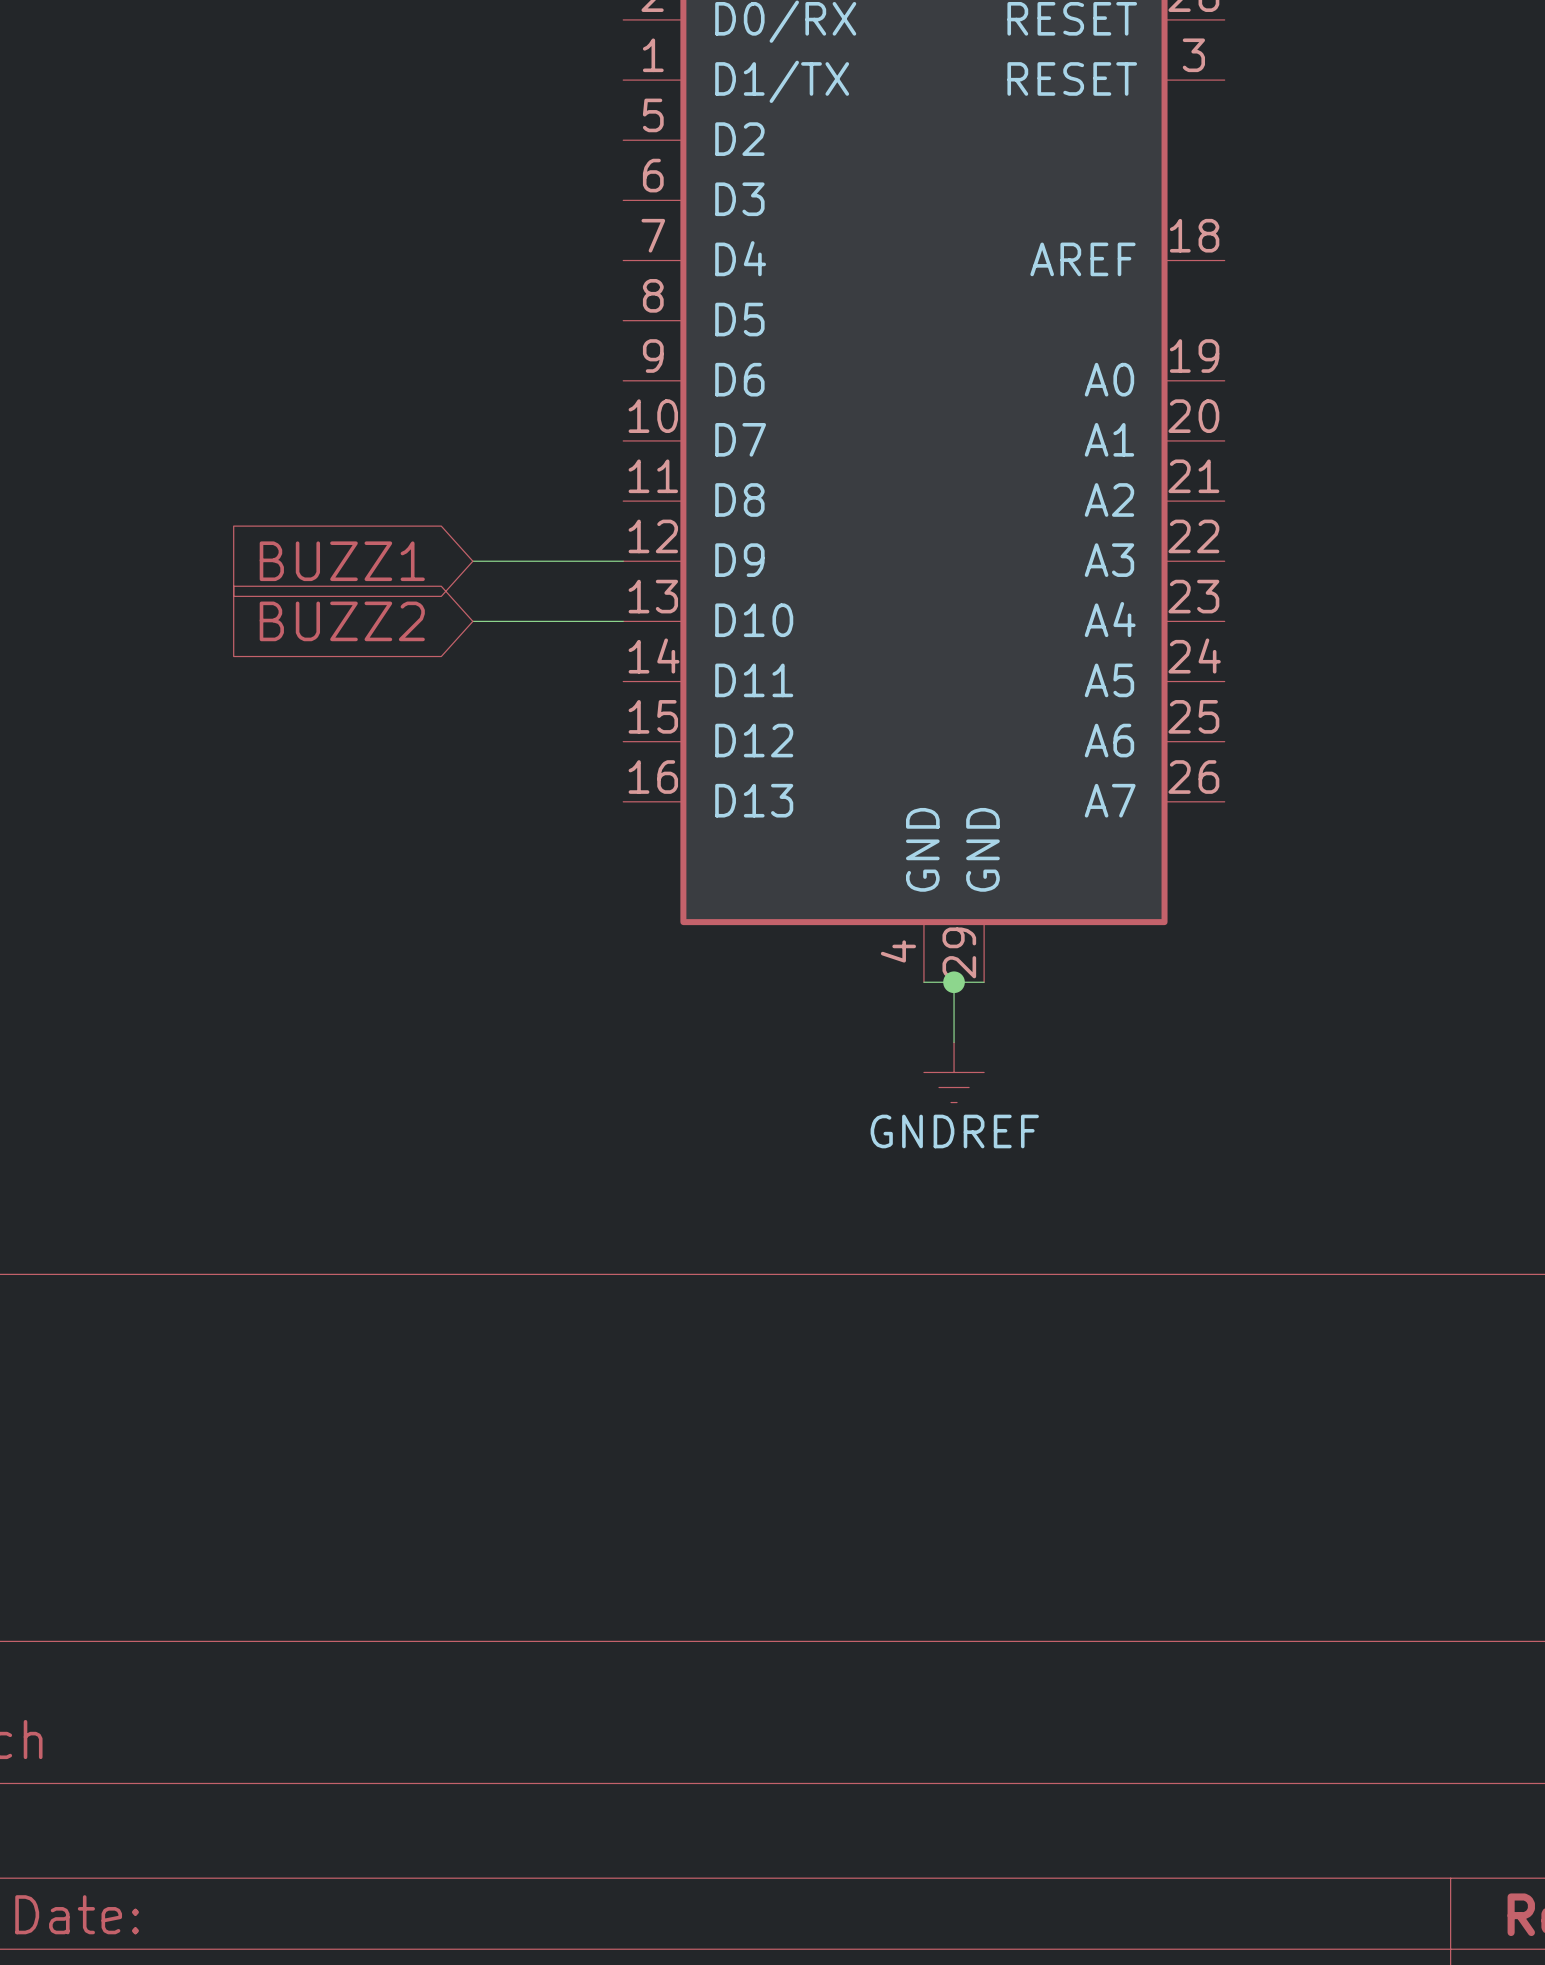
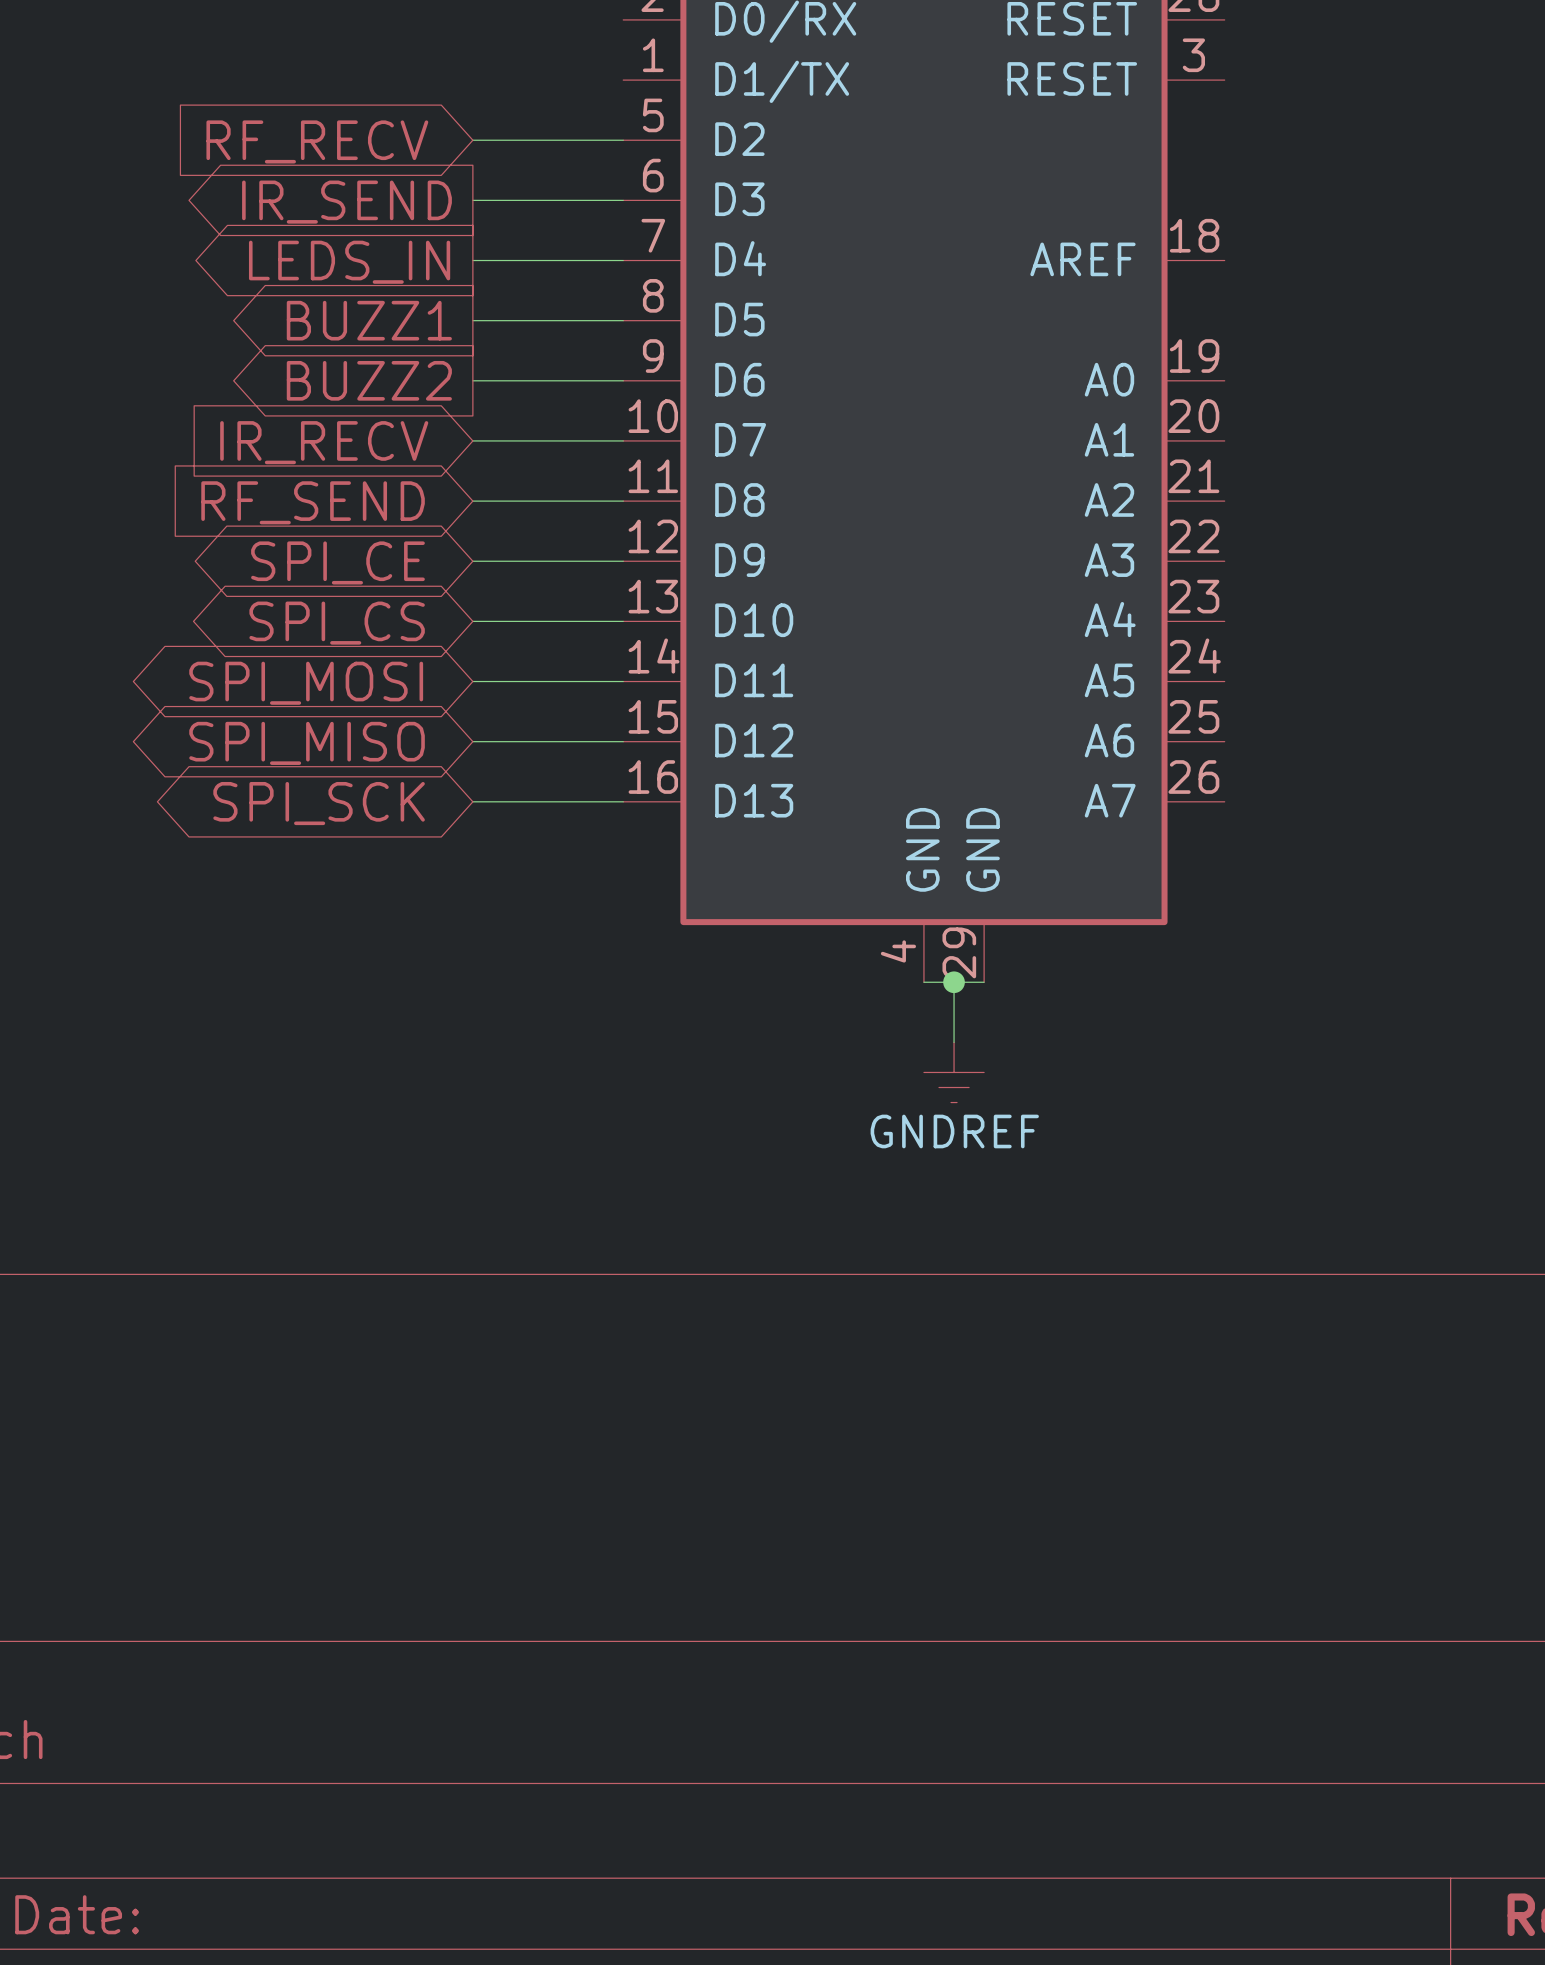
wire: none -> (472, 140) (623, 140)
global label: none -> RF_RECV (317, 141)
wire: none -> (472, 200) (623, 200)
global label: none -> IR_SEND (346, 202)
wire: none -> (472, 260) (623, 260)
global label: none -> LEDS_IN (349, 262)
global label: none -> BUZZ1 (369, 320)
wire: none -> (472, 320) (623, 320)
global label: none -> BUZZ2 (369, 380)
wire: none -> (472, 380) (623, 380)
wire: none -> (472, 440) (623, 440)
global label: none -> IR_RECV (324, 442)
wire: none -> (472, 501) (623, 501)
global label: none -> RF_SEND (313, 502)
global label shape: input (342, 561) -> bidirectional (337, 562)
global label: BUZZ1 (342, 561) -> SPI_CE (337, 562)
global label shape: input (342, 621) -> bidirectional (337, 623)
global label: BUZZ2 (342, 621) -> SPI_CS (337, 623)
wire: none -> (472, 681) (623, 681)
global label: none -> SPI_MOSI (306, 683)
wire: none -> (472, 741) (623, 741)
global label: none -> SPI_MISO (307, 743)
wire: none -> (472, 801) (623, 801)
global label: none -> SPI_SCK (319, 803)

